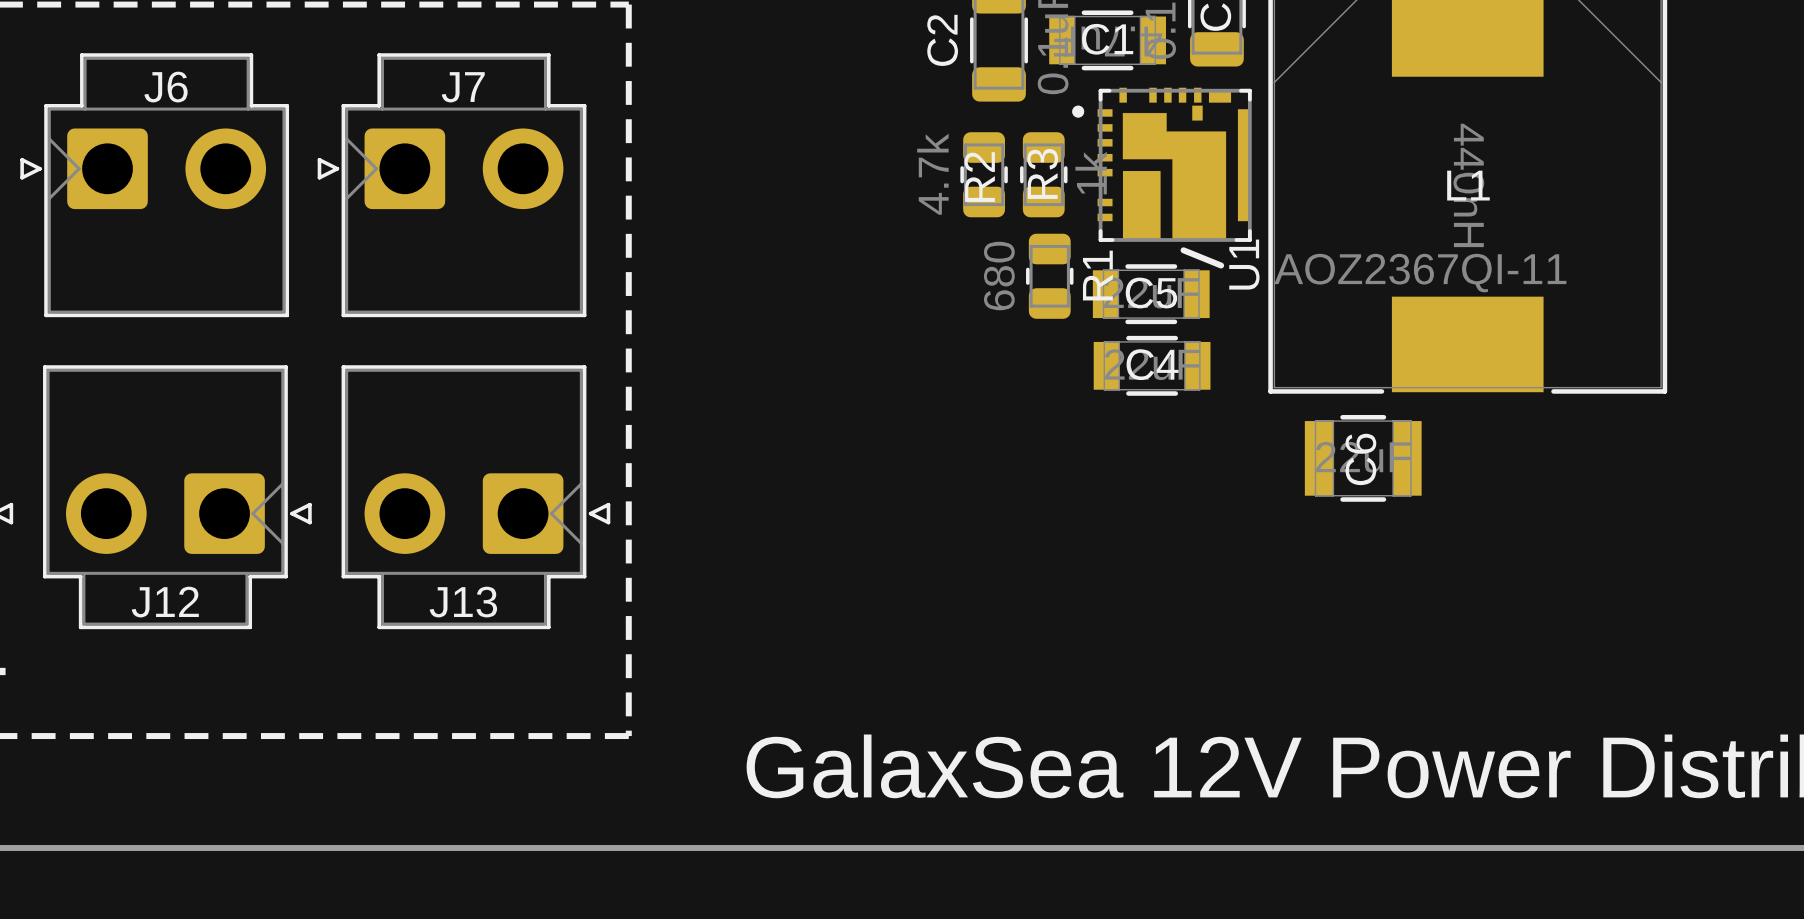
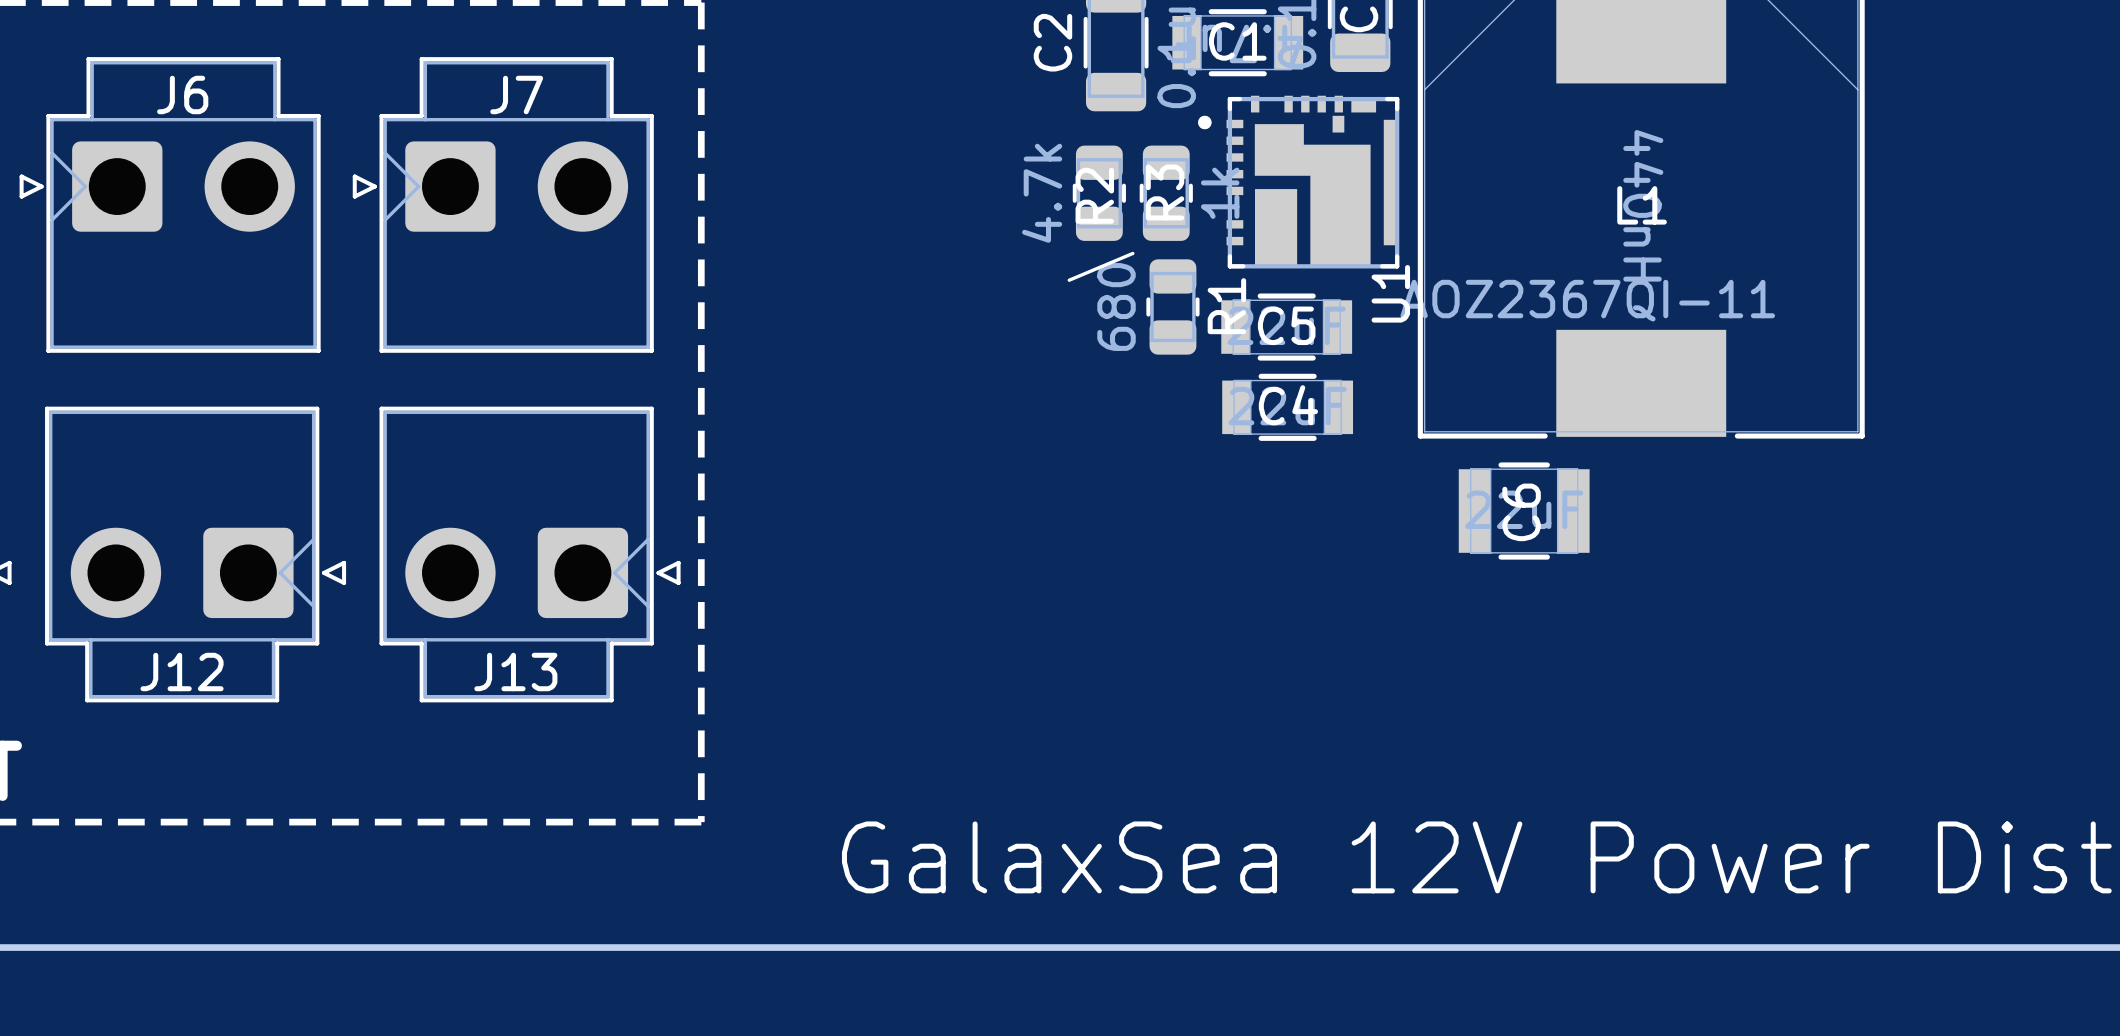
line: none -> (1132, 253) (1069, 280)
line: (1183, 250) (1221, 265) -> none

